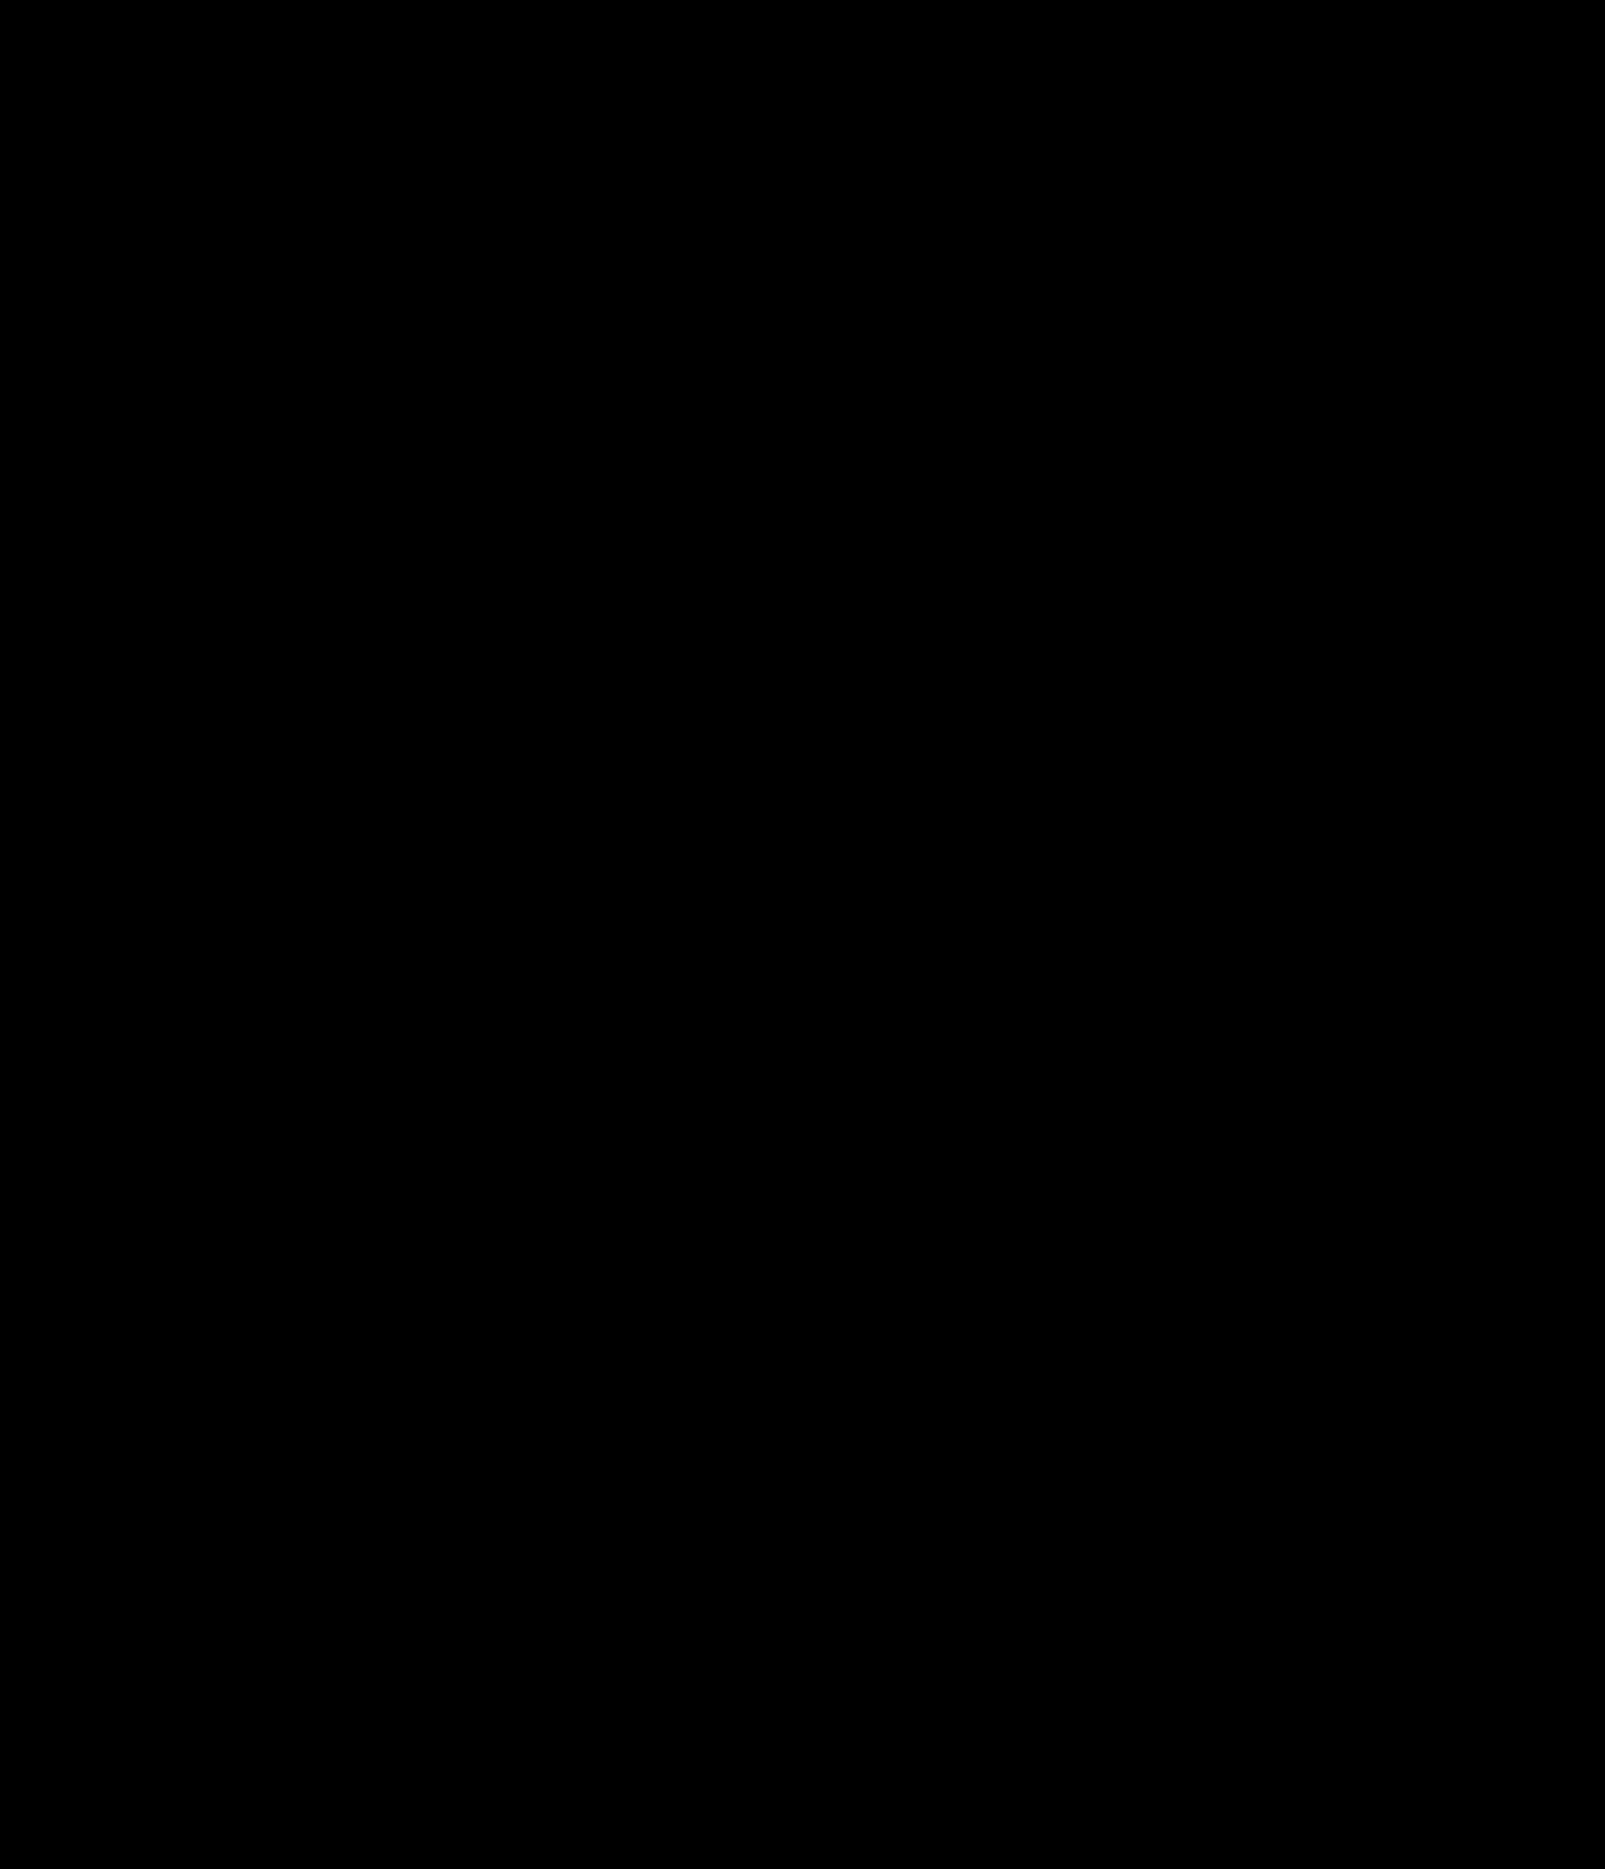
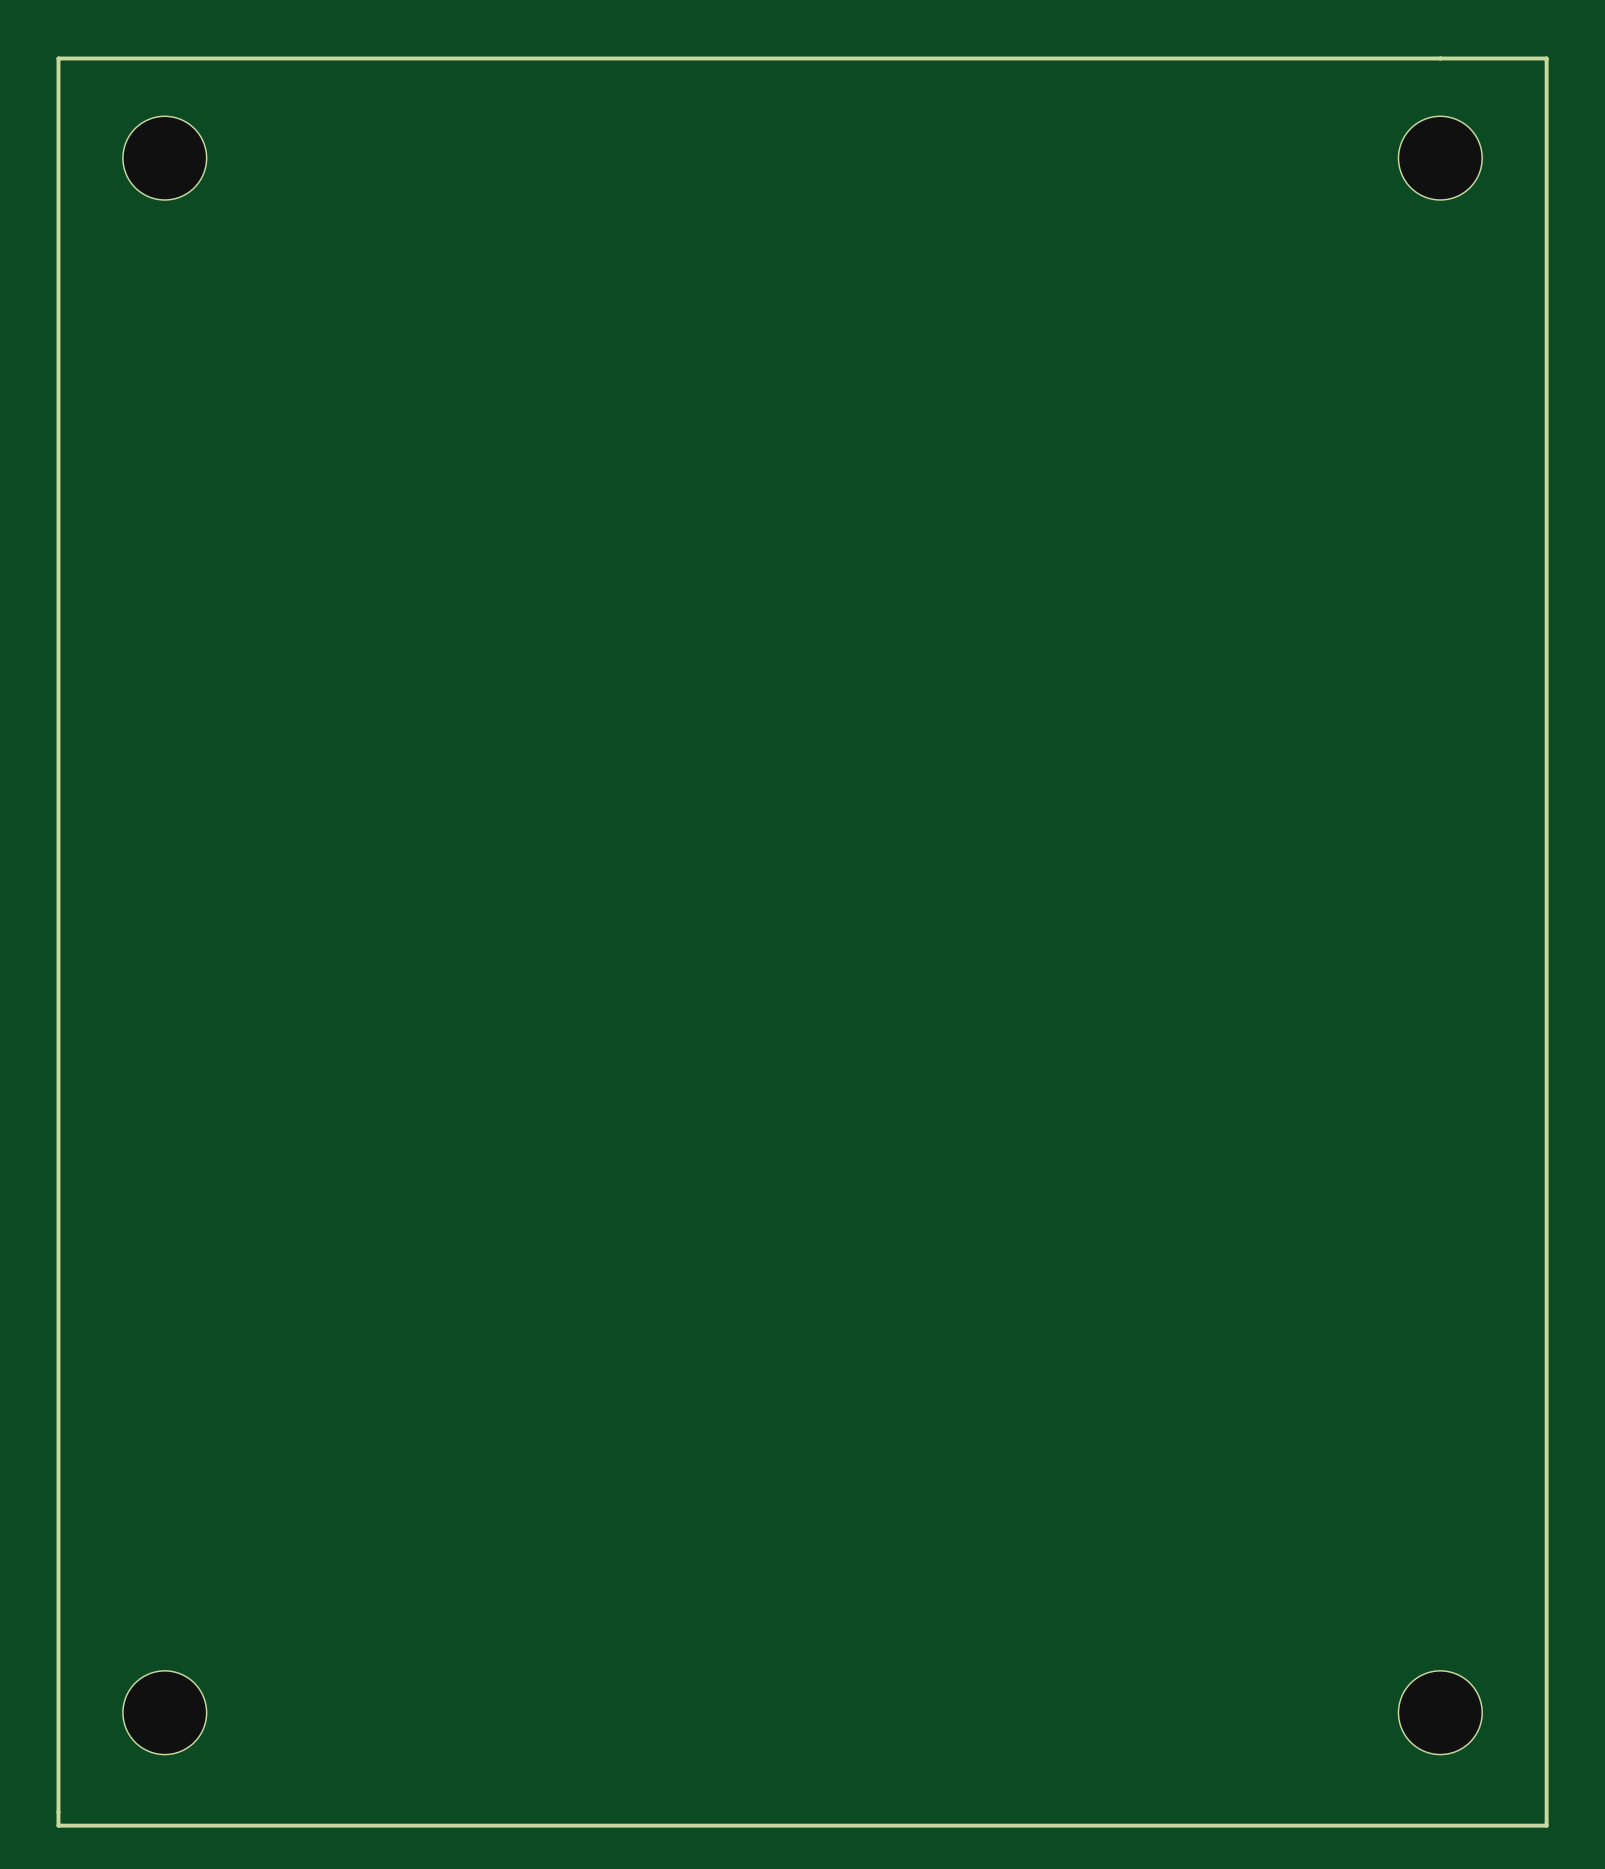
board edge: none -> (1546, 58) (58, 58) (58, 1825) (1546, 1825) (1546, 58)
part: none -> (164, 158)
part: none -> (1440, 158)
part: none -> (164, 1712)
part: none -> (1440, 1712)

